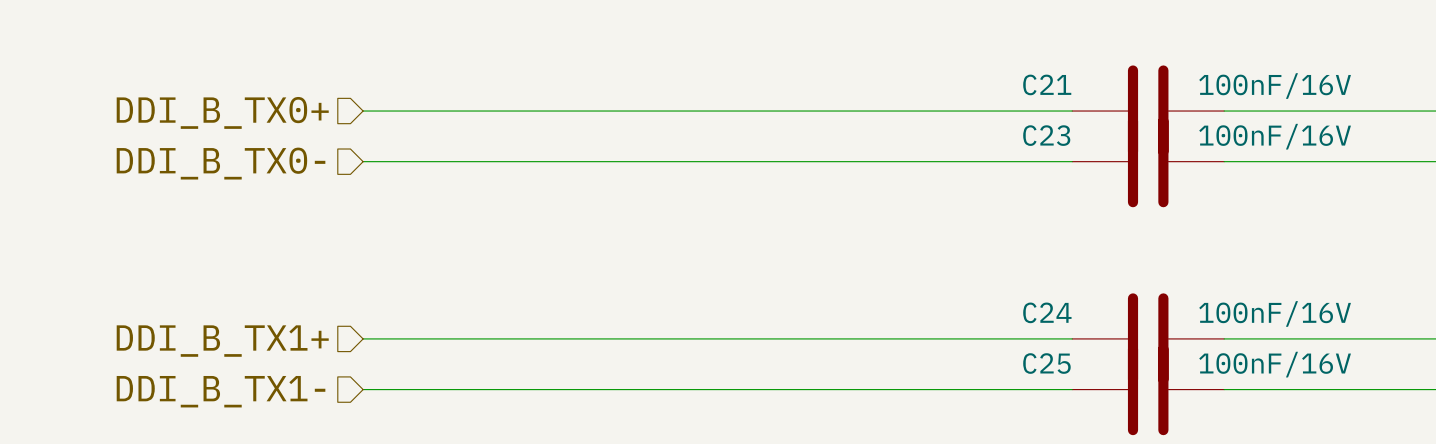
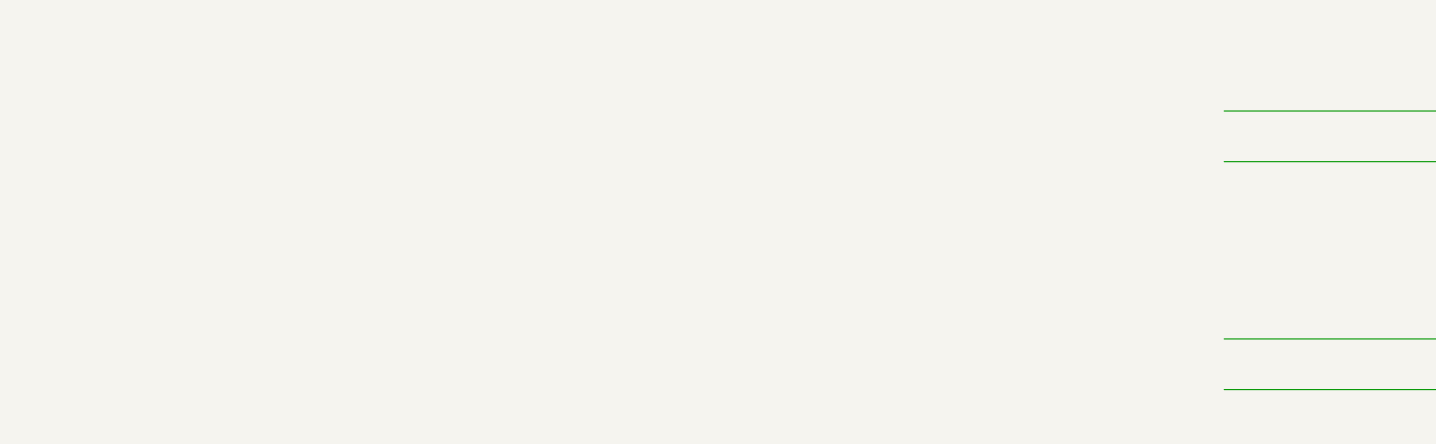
wire: (363, 111) (1072, 111) -> none
C21: 100nF/16V (1148, 111) -> none
hierarchical label: DDI_B_TX0+ (222, 112) -> none
wire: (363, 161) (1072, 161) -> none
C23: 100nF/16V (1148, 161) -> none
hierarchical label: DDI_B_TX0- (221, 163) -> none
wire: (363, 338) (1072, 338) -> none
C24: 100nF/16V (1148, 338) -> none
hierarchical label: DDI_B_TX1+ (222, 341) -> none
wire: (363, 389) (1072, 389) -> none
C25: 100nF/16V (1148, 389) -> none
hierarchical label: DDI_B_TX1- (221, 391) -> none

